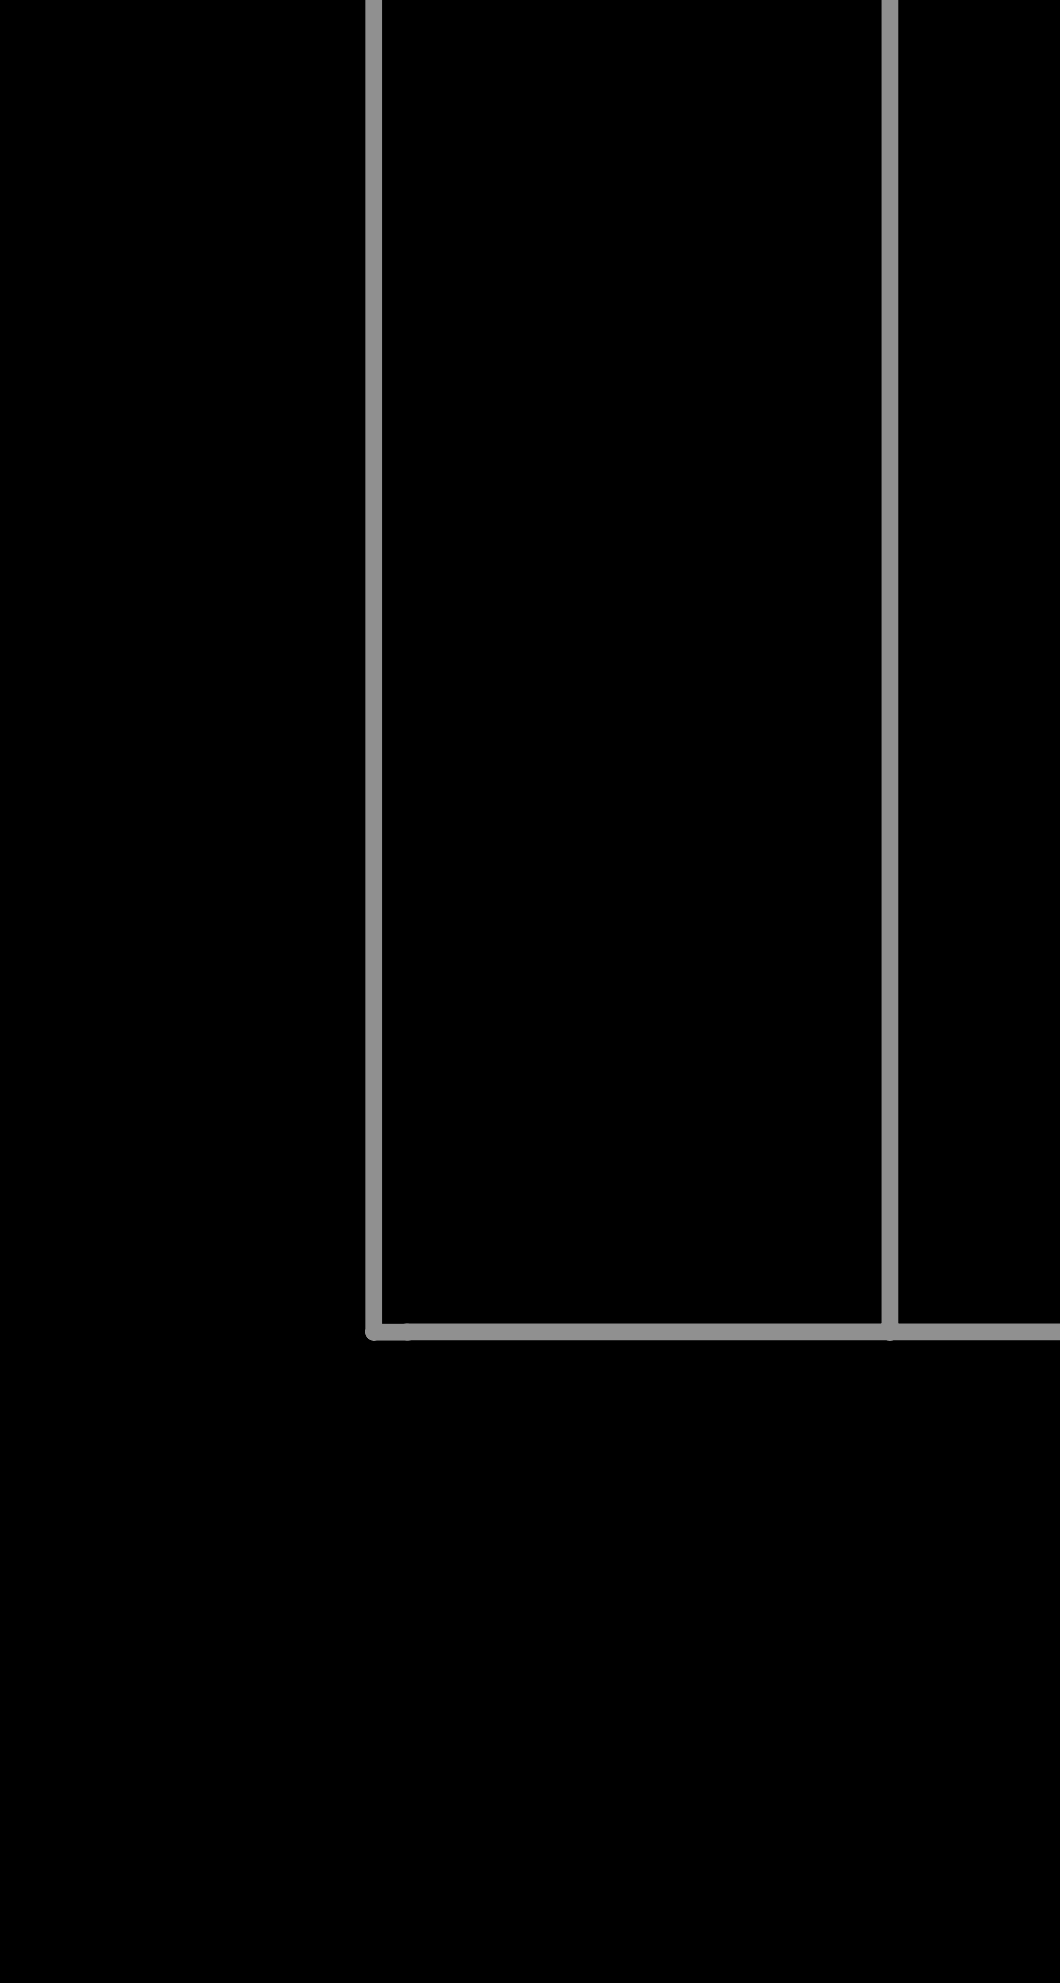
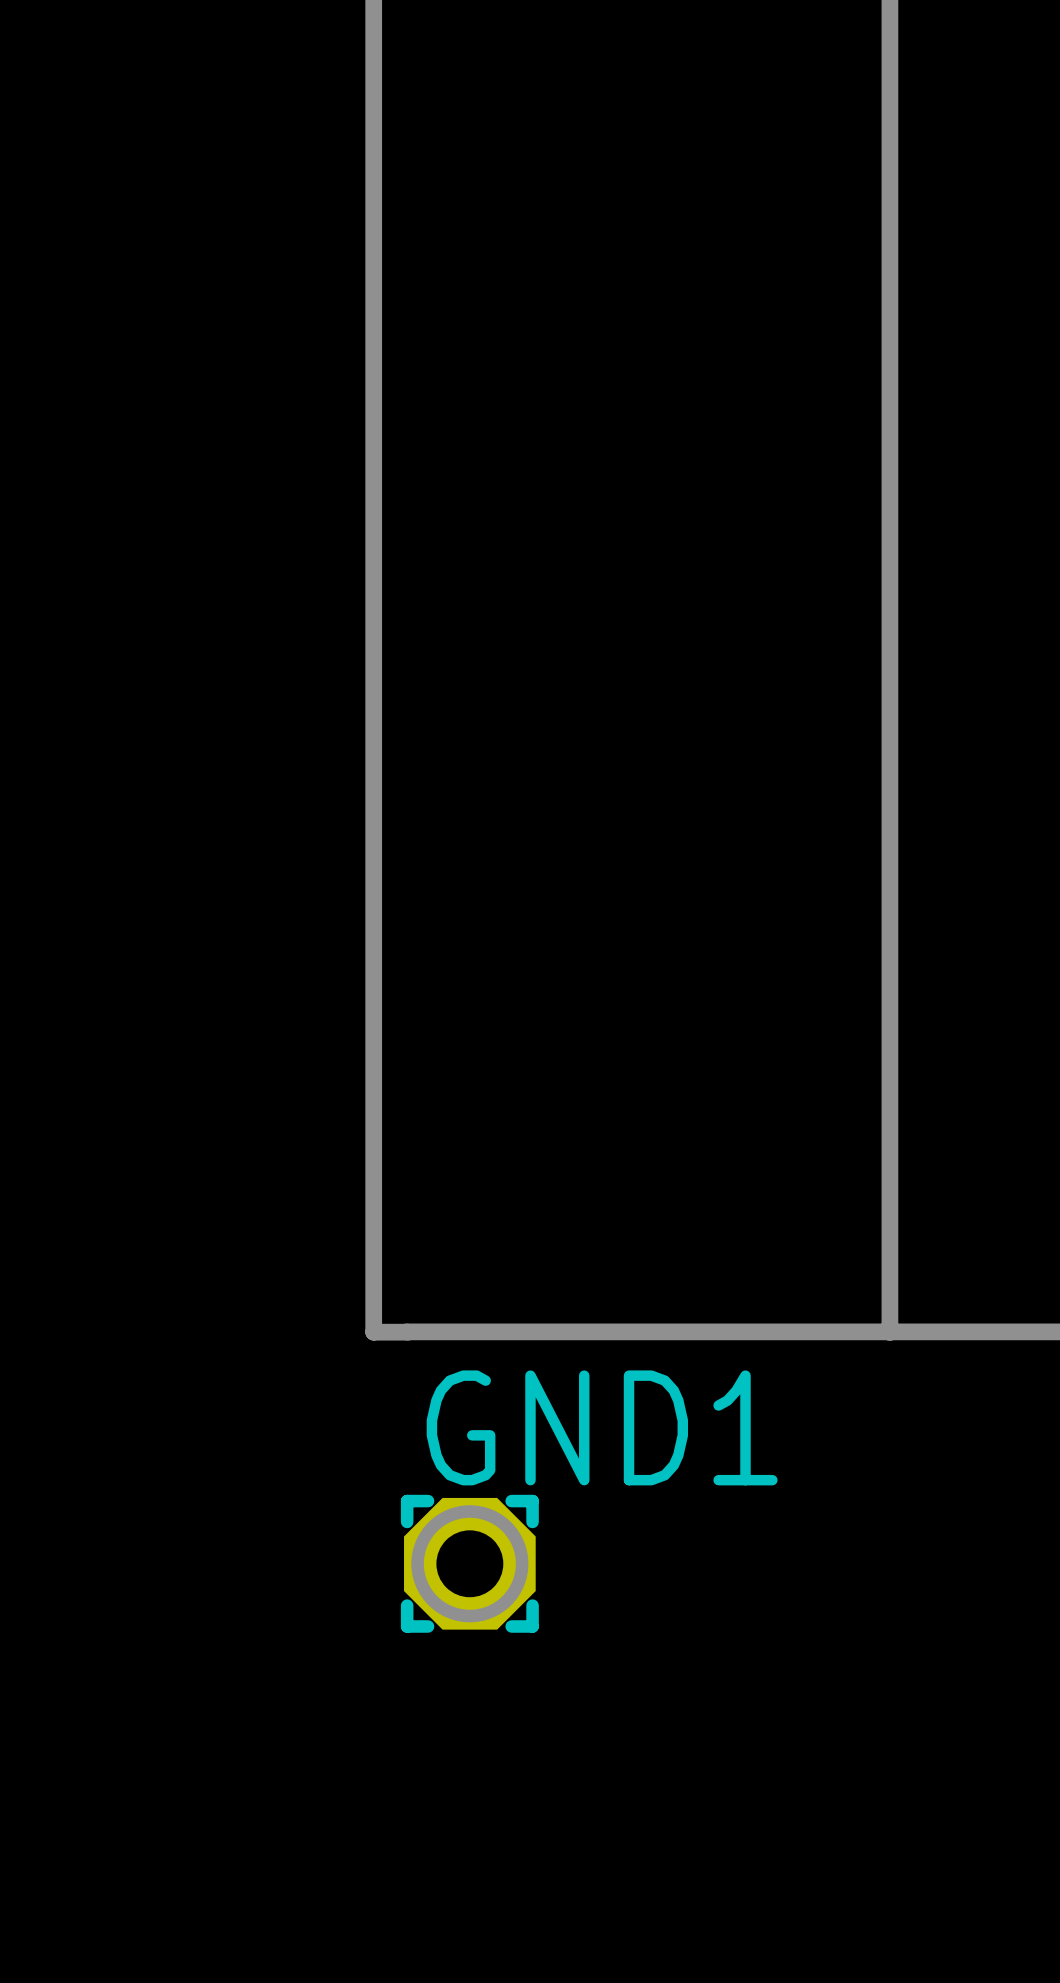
GND1: none -> (469, 1563)

